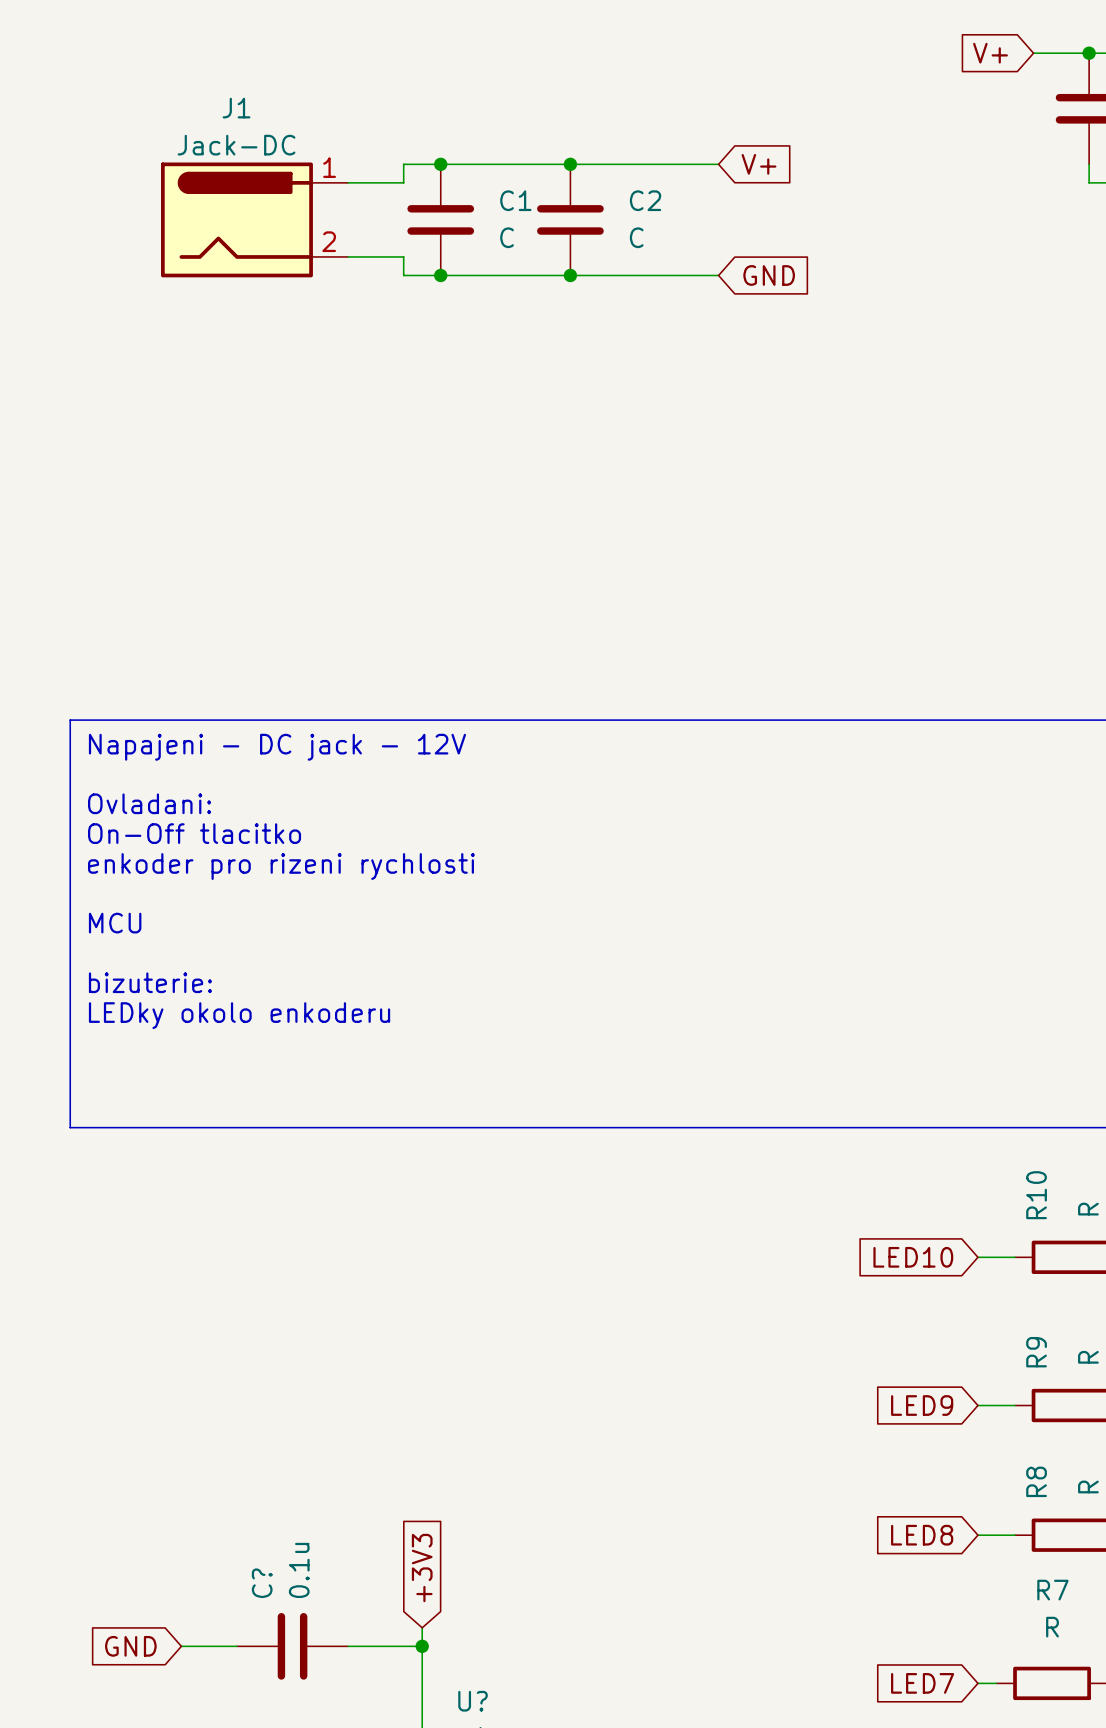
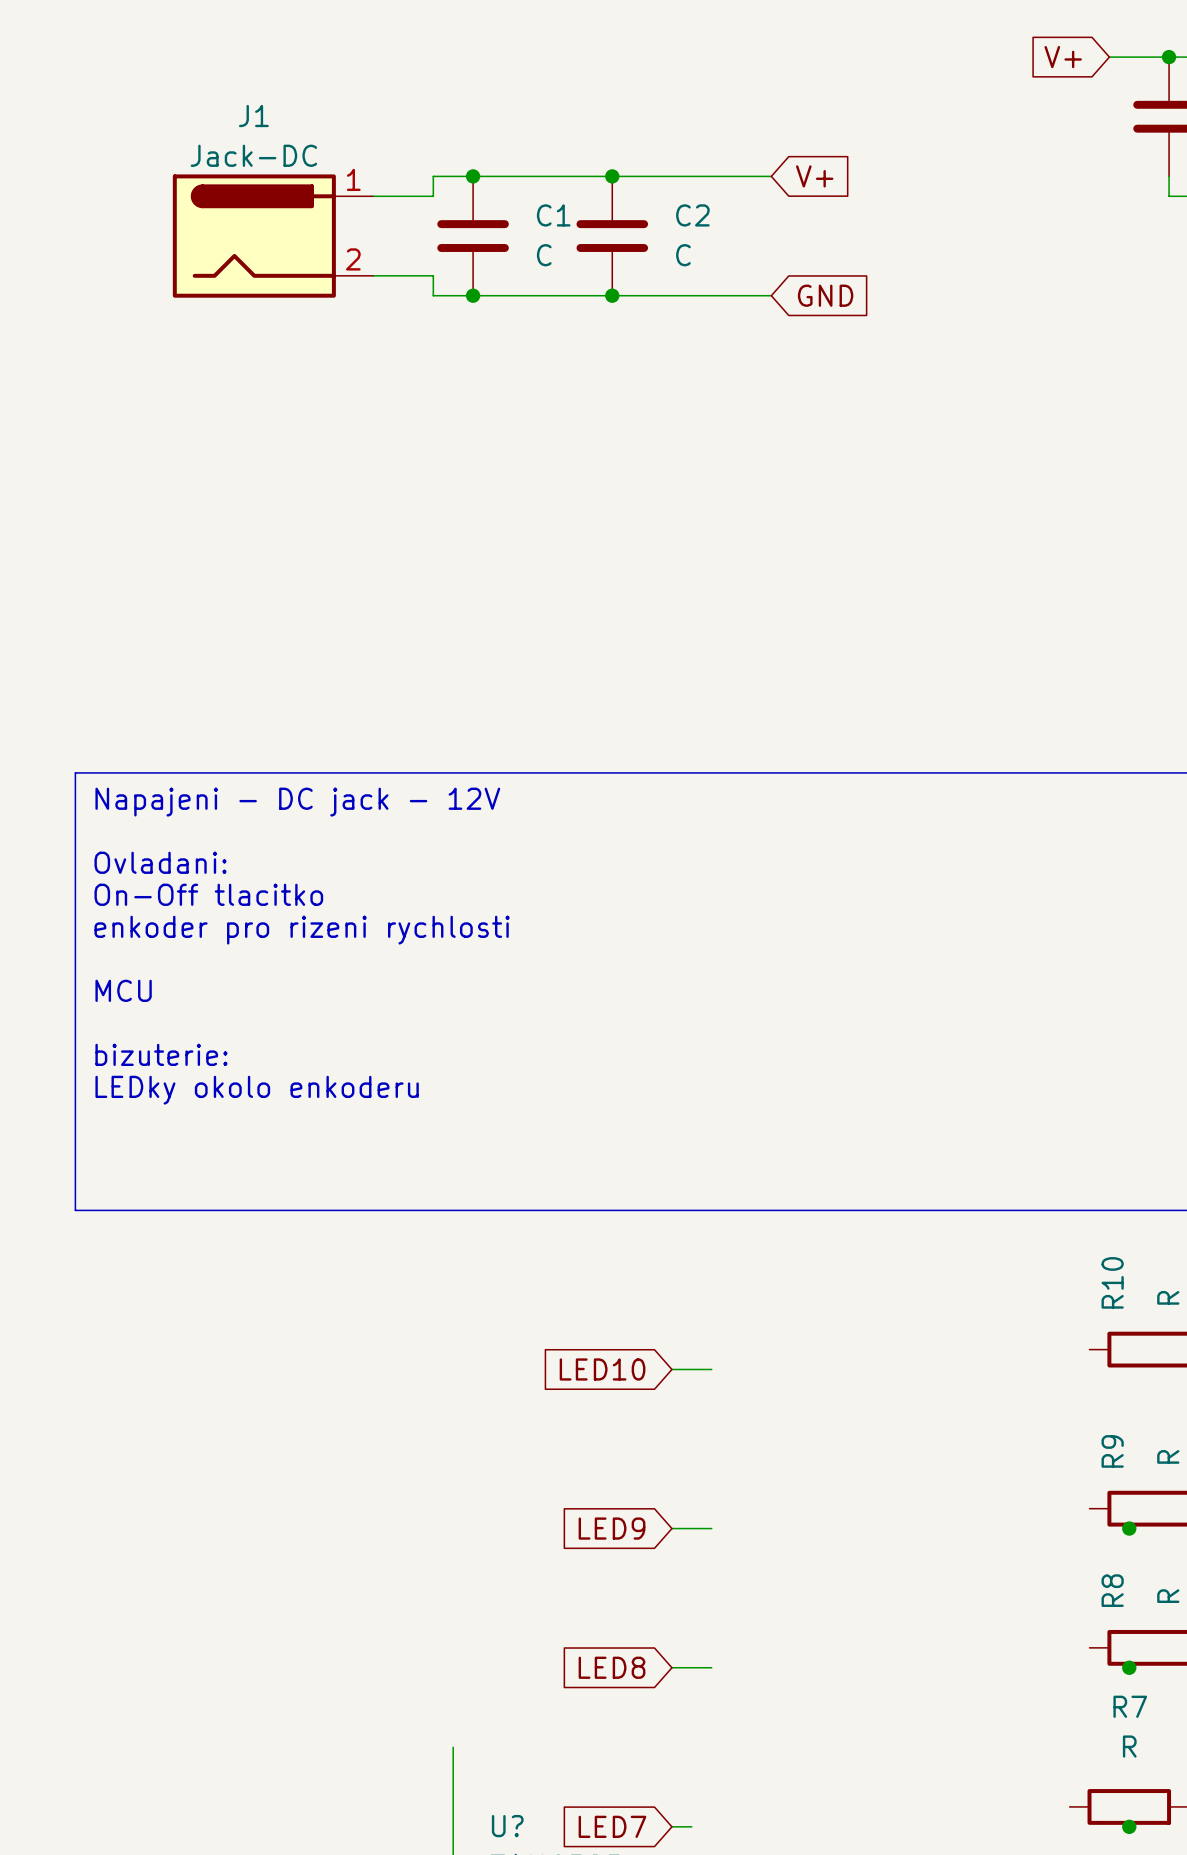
global label position: LED10 (913, 1257) -> LED10 (602, 1369)
wire: (977, 1257) (1015, 1257) -> (671, 1369) (711, 1369)
global label position: LED9 (922, 1405) -> LED9 (612, 1528)
wire: (977, 1405) (1015, 1405) -> (671, 1528) (711, 1528)
junction: none -> (1129, 1528)
global label: LED8 (922, 1535) -> none
wire: (977, 1535) (1015, 1535) -> (671, 1667) (711, 1667)
global label: none -> LED8 (612, 1667)
junction: none -> (1129, 1667)
global label: +3V3 (422, 1568) -> none
global label: GND (130, 1646) -> none
wire: (181, 1646) (236, 1646) -> none
C?: 0.1u (292, 1646) -> none
wire: (348, 1646) (422, 1646) -> none
junction: (422, 1646) -> none
global label: LED7 (922, 1683) -> none
wire: (977, 1683) (996, 1683) -> (671, 1826) (691, 1826)
global label: none -> LED7 (612, 1826)
junction: none -> (1129, 1826)

